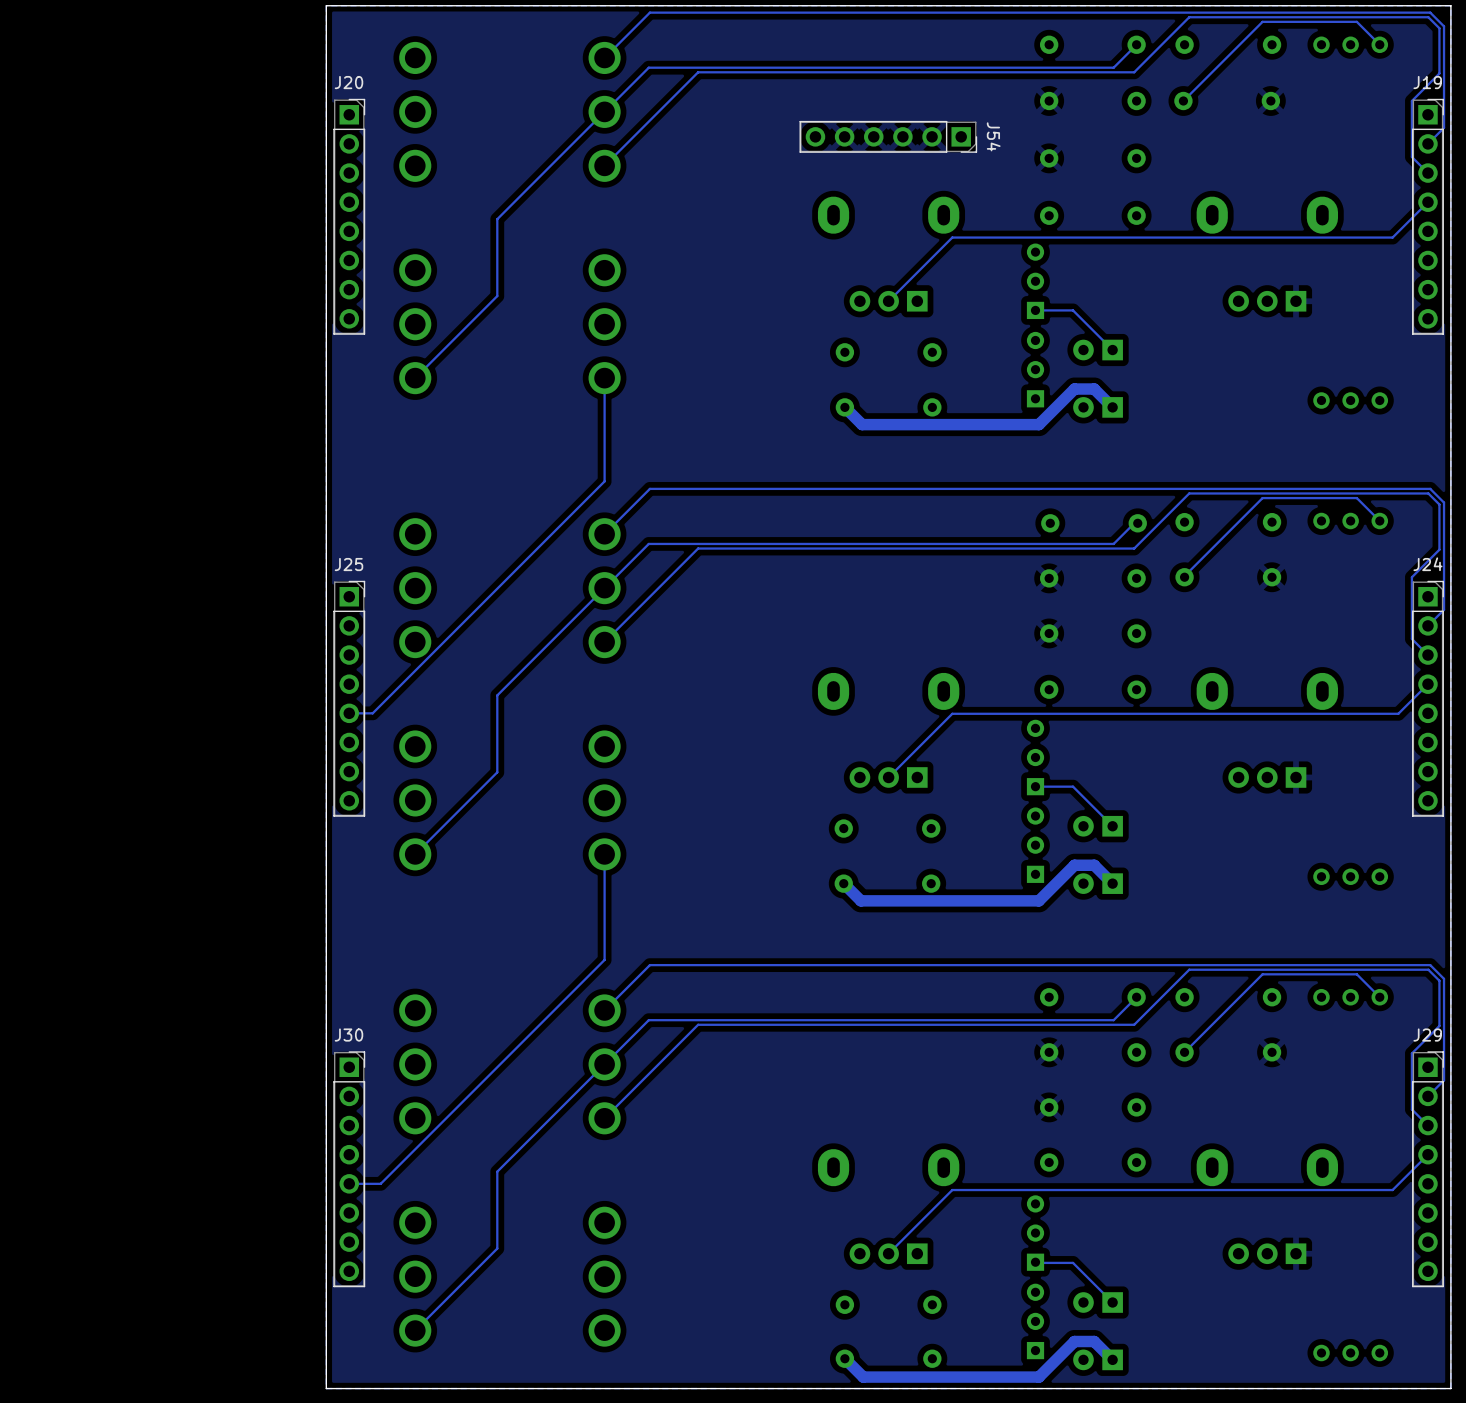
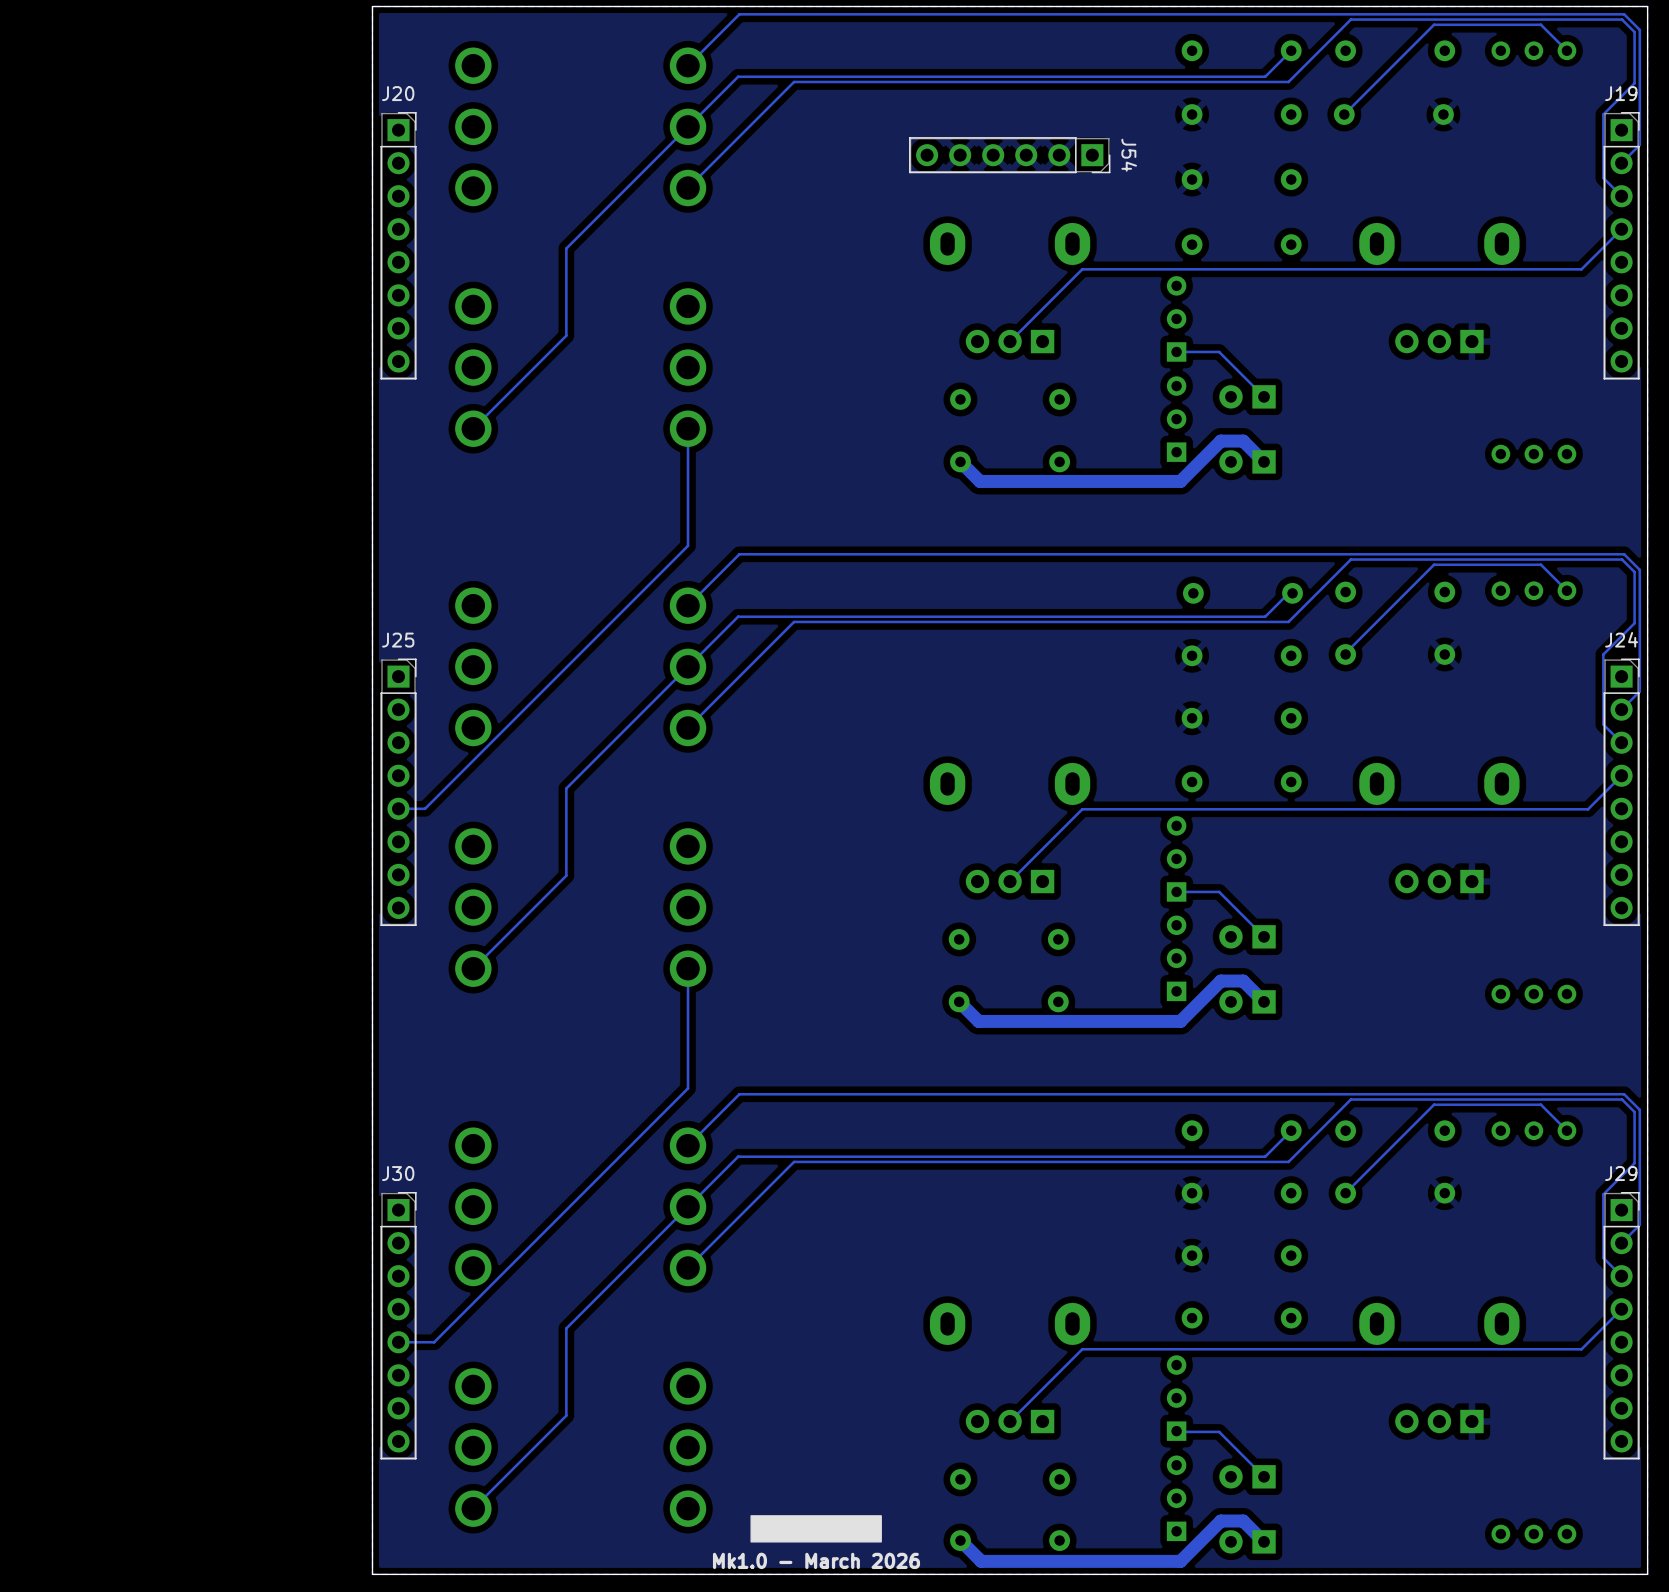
drawing: none -> [750, 1515, 882, 1543]
text: none -> Mk1.0 - March 2026 (816, 1560)

